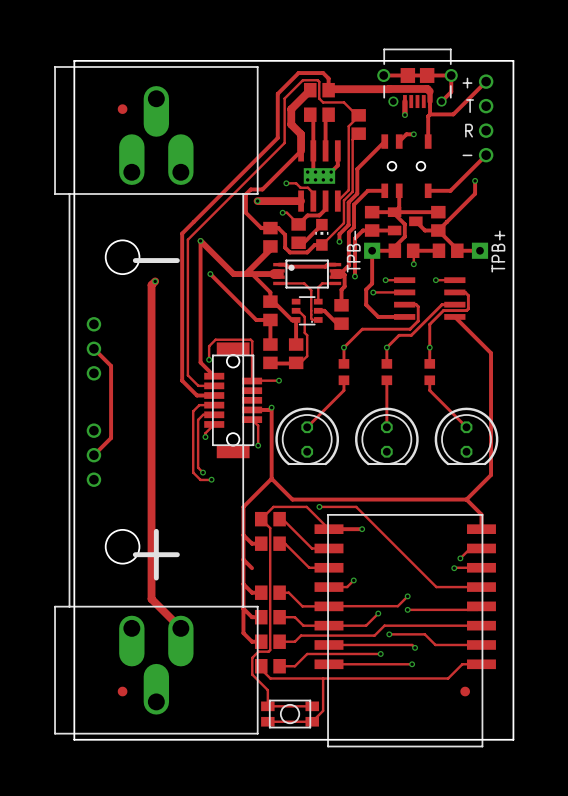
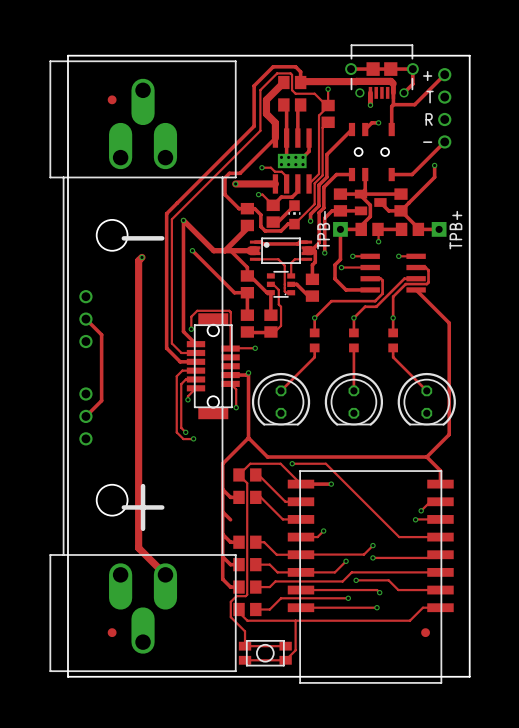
track: none -> (328, 89) (328, 105)
via: none -> (328, 89)

